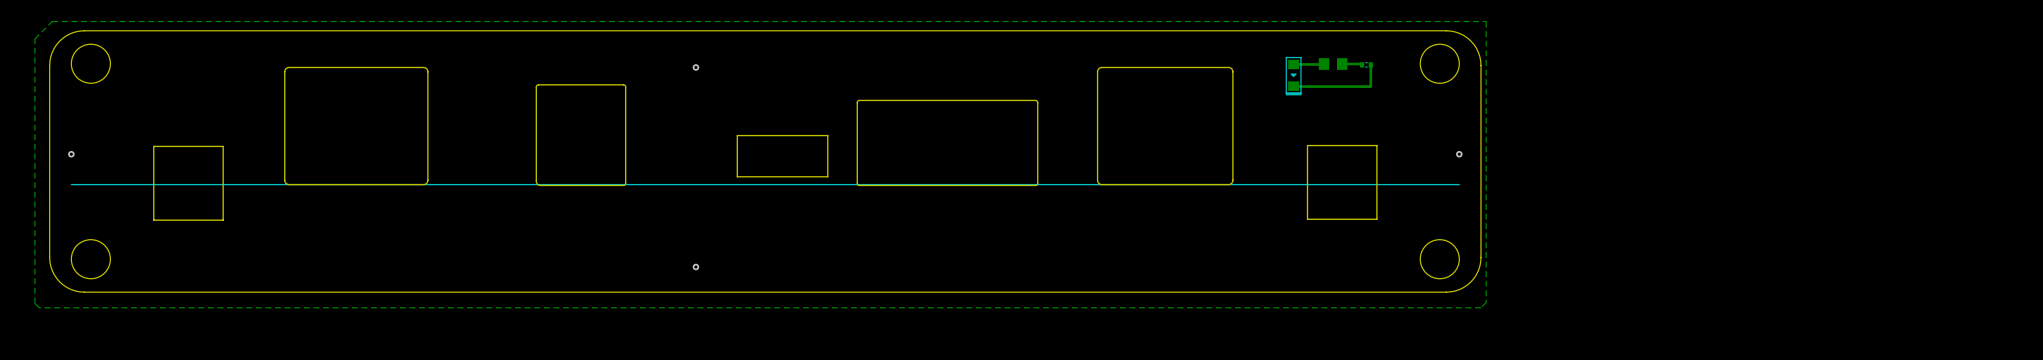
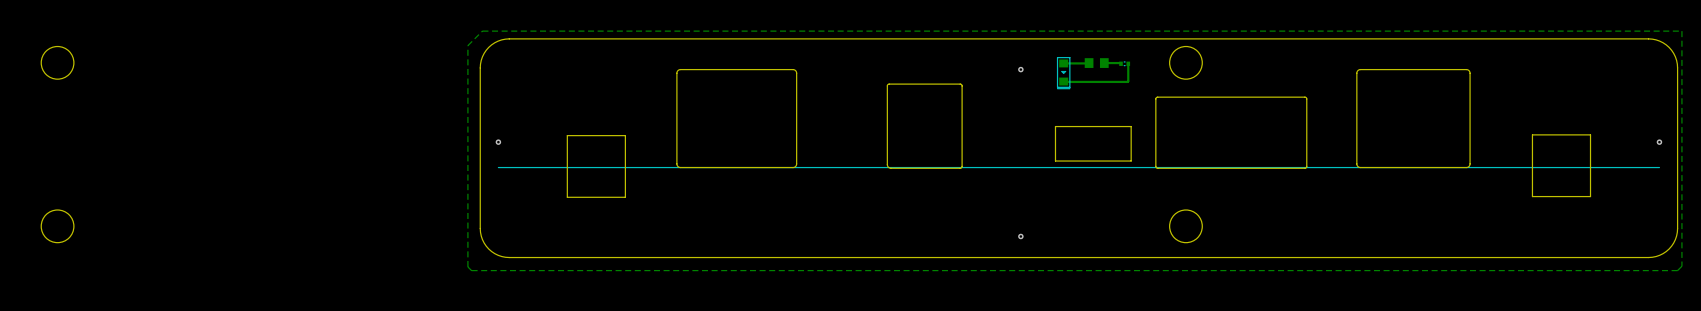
zone outline: (1486, 21) (1486, 302) (1480, 307) (39, 307) (34, 303) (34, 38) (52, 21) (1486, 21) -> none
zone outline: none -> (1681, 31) (1681, 266) (1677, 270) (471, 270) (467, 266) (467, 45) (482, 31) (1681, 31)
board edge: (1446, 30) (79, 31) (67, 35) (59, 40) (54, 48) (49, 60) (49, 261) (54, 274) (59, 281) (71, 289) (84, 292) (1450, 291) (1463, 287) (1470, 281) (1476, 274) (1480, 261) (1480, 65) (1478, 52) (1470, 40) (1459, 33) (1446, 30) -> none
board edge: none -> (1648, 38) (505, 39) (488, 47) (480, 64) (480, 232) (488, 249) (498, 255) (509, 257) (1652, 257) (1669, 249) (1677, 232) (1677, 67) (1675, 56) (1669, 47) (1659, 41) (1648, 38)
board edge: (423, 67) (286, 68) (284, 71) (285, 182) (289, 184) (426, 183) (427, 180) (427, 71) (423, 67) -> none
via: (695, 67) -> none
board edge: (1228, 67) (1098, 68) (1098, 183) (1231, 183) (1232, 71) (1228, 67) -> none
board edge: none -> (793, 69) (678, 70) (677, 166) (795, 166) (796, 73) (793, 69)
via: none -> (1020, 69)
board edge: none -> (1466, 69) (1357, 70) (1357, 166) (1468, 166) (1470, 73) (1466, 69)
board edge: (623, 84) (536, 85) (536, 181) (538, 184) (625, 184) (625, 87) (623, 84) -> none
board edge: none -> (960, 84) (887, 84) (888, 167) (961, 167) (962, 85) (960, 84)
board edge: (1035, 100) (858, 100) (857, 184) (1036, 185) (1037, 102) (1035, 100) -> none
board edge: none -> (1304, 97) (1156, 97) (1155, 167) (1305, 168) (1306, 99) (1304, 97)
board edge: (827, 135) (737, 135) (737, 176) (827, 176) (827, 135) -> none
board edge: none -> (1131, 126) (1055, 126) (1055, 161) (1131, 161) (1131, 126)
board edge: (1376, 145) (1376, 219) (1307, 219) (1307, 145) (1376, 145) -> none
board edge: (223, 146) (223, 220) (153, 220) (153, 146) (223, 146) -> none
board edge: none -> (1590, 134) (1590, 196) (1532, 196) (1532, 134) (1590, 134)
board edge: none -> (625, 135) (625, 197) (567, 197) (567, 135) (625, 135)
via: (71, 154) -> none
via: (1459, 154) -> none
via: none -> (498, 142)
via: none -> (1659, 142)
line: (1459, 184) (71, 184) -> none
line: none -> (1659, 167) (498, 167)
via: (695, 267) -> none
via: none -> (1020, 236)

